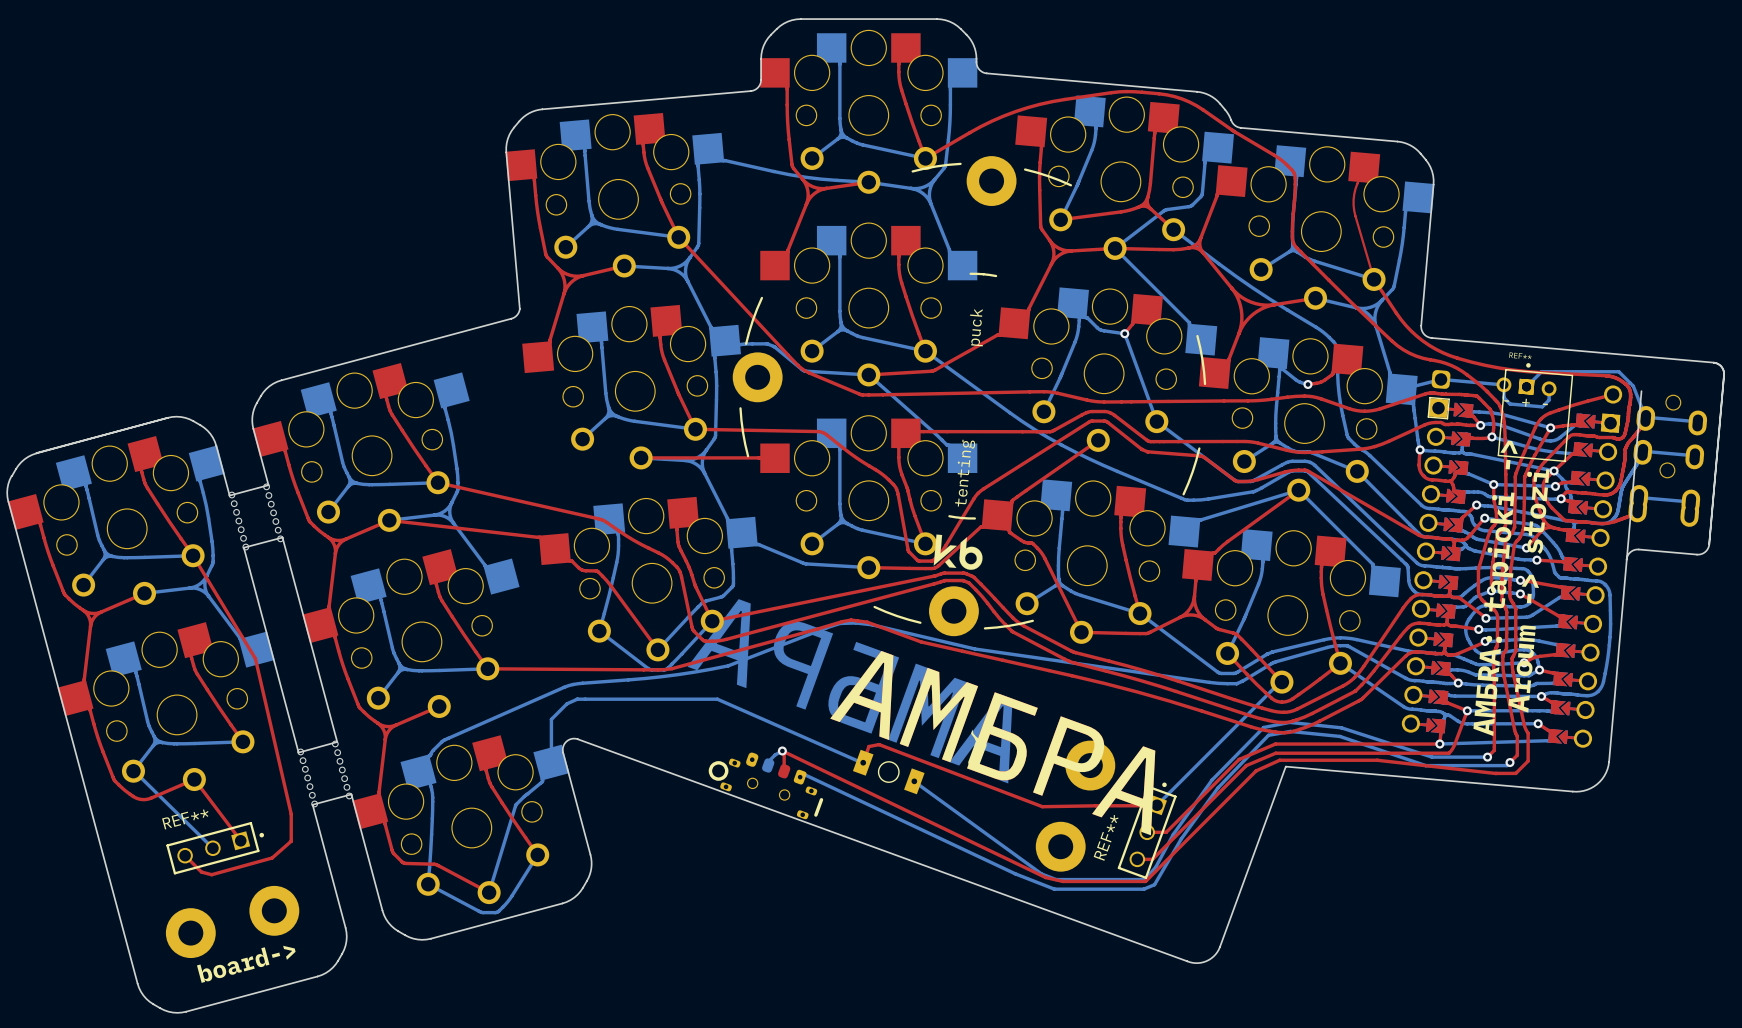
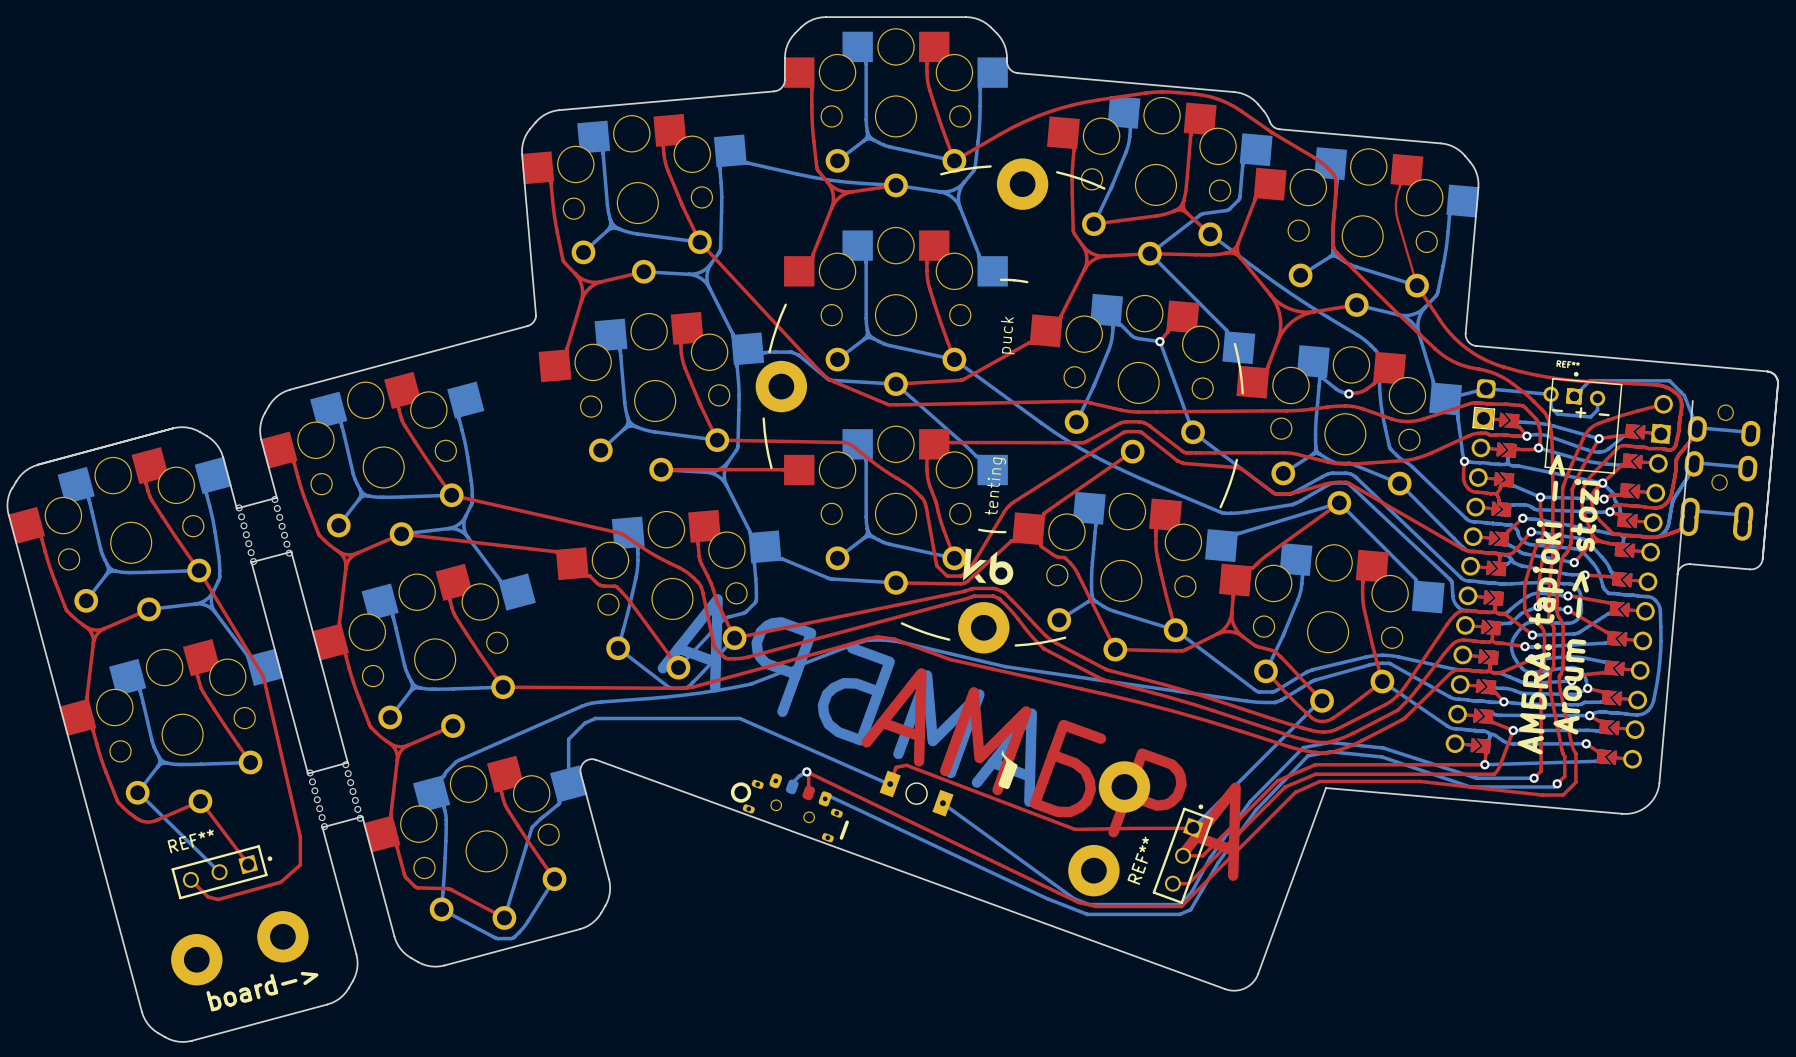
text: АМБРА (992, 743) -> none

